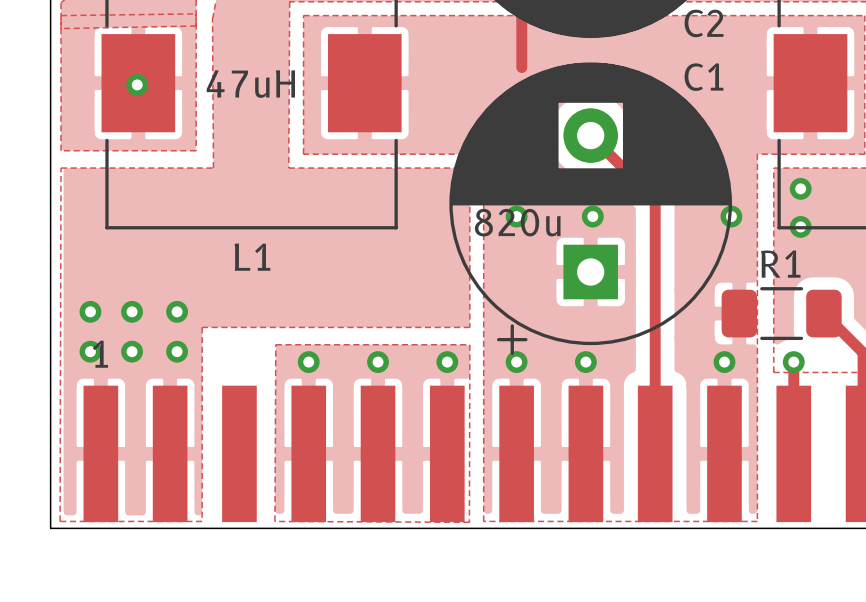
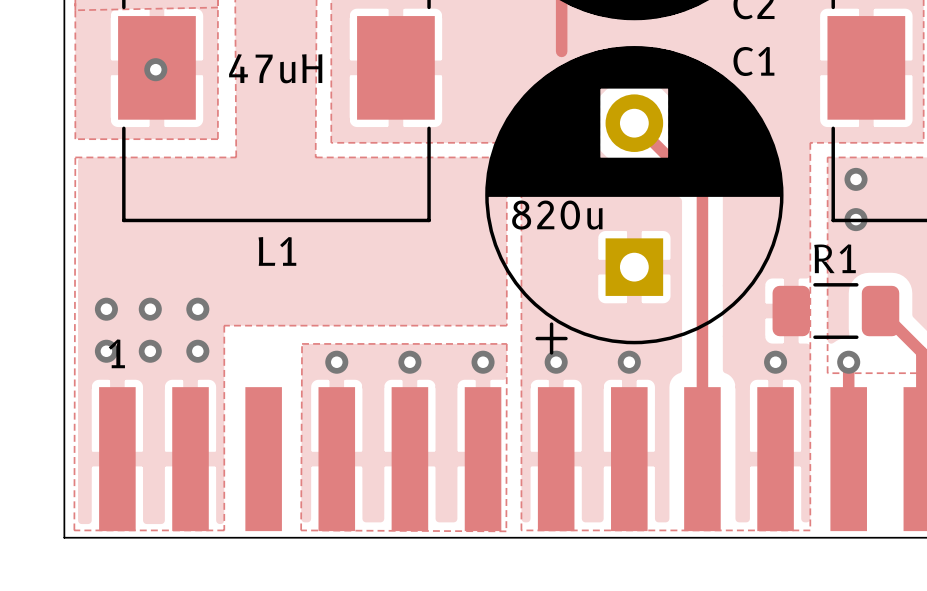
via: (516, 216) -> none
via: (592, 216) -> none
via: (731, 216) -> none

